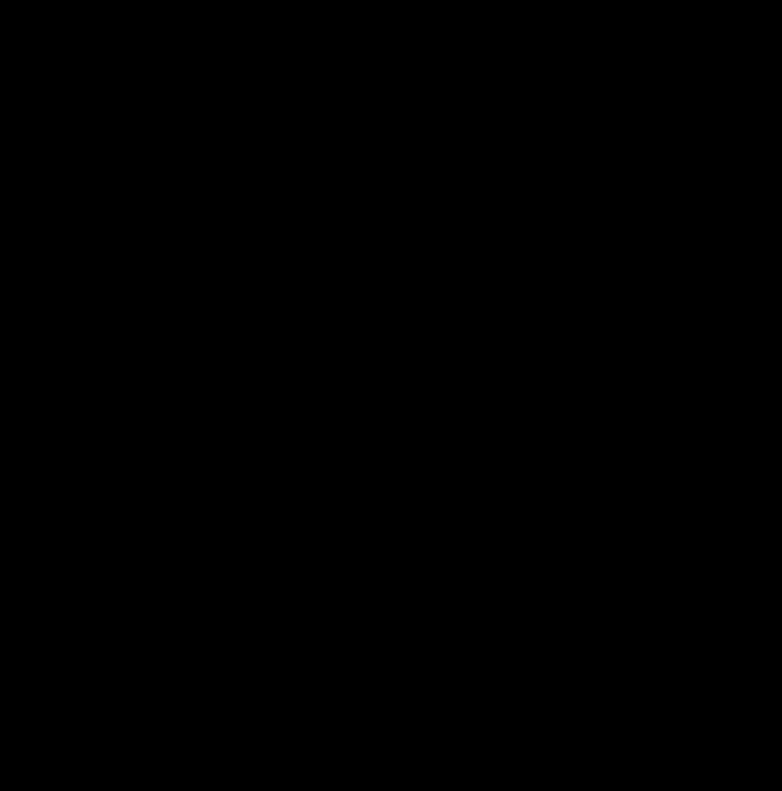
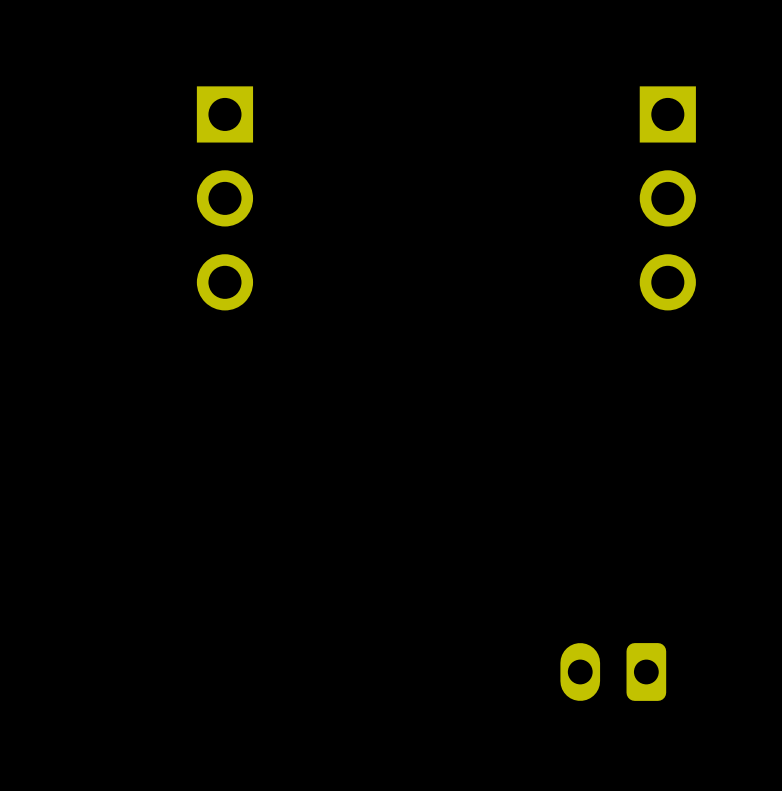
part: none -> (224, 198)
part: none -> (667, 198)
part: none -> (613, 671)

